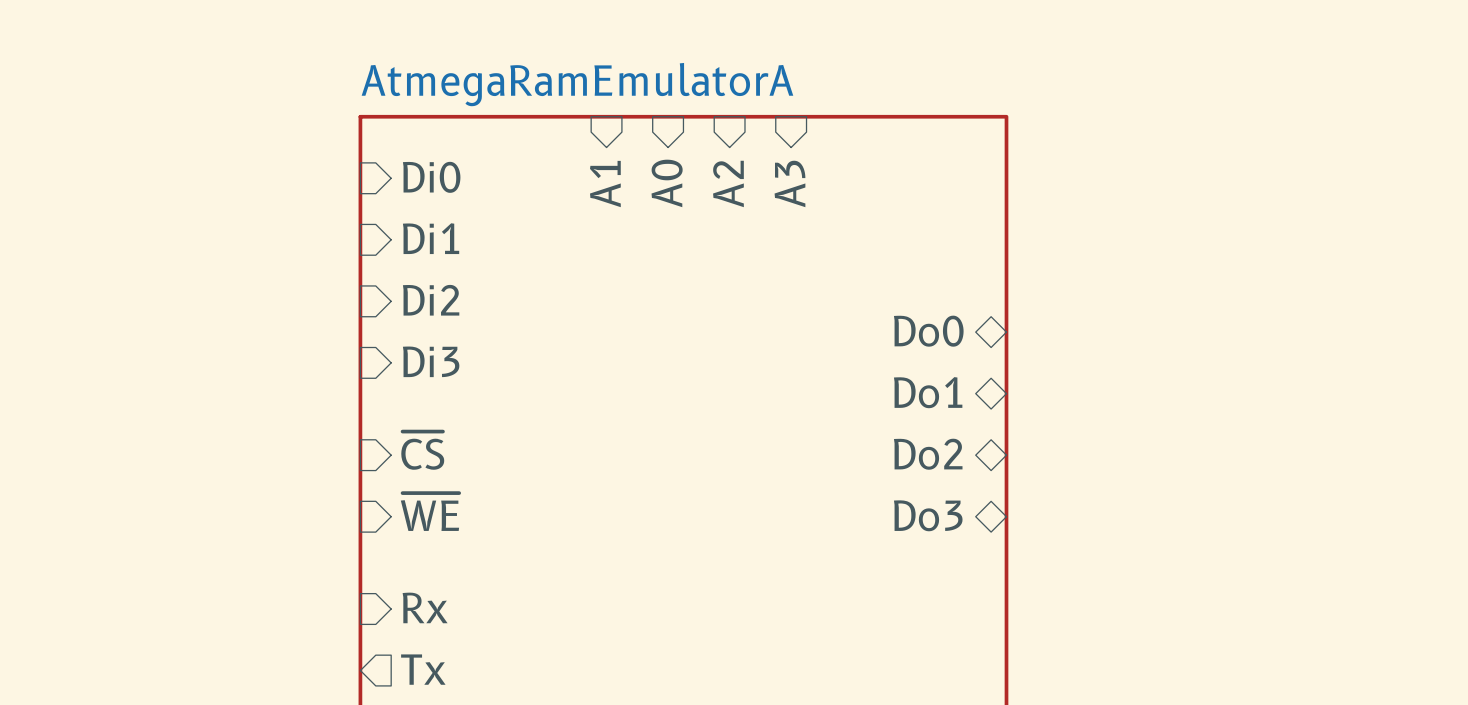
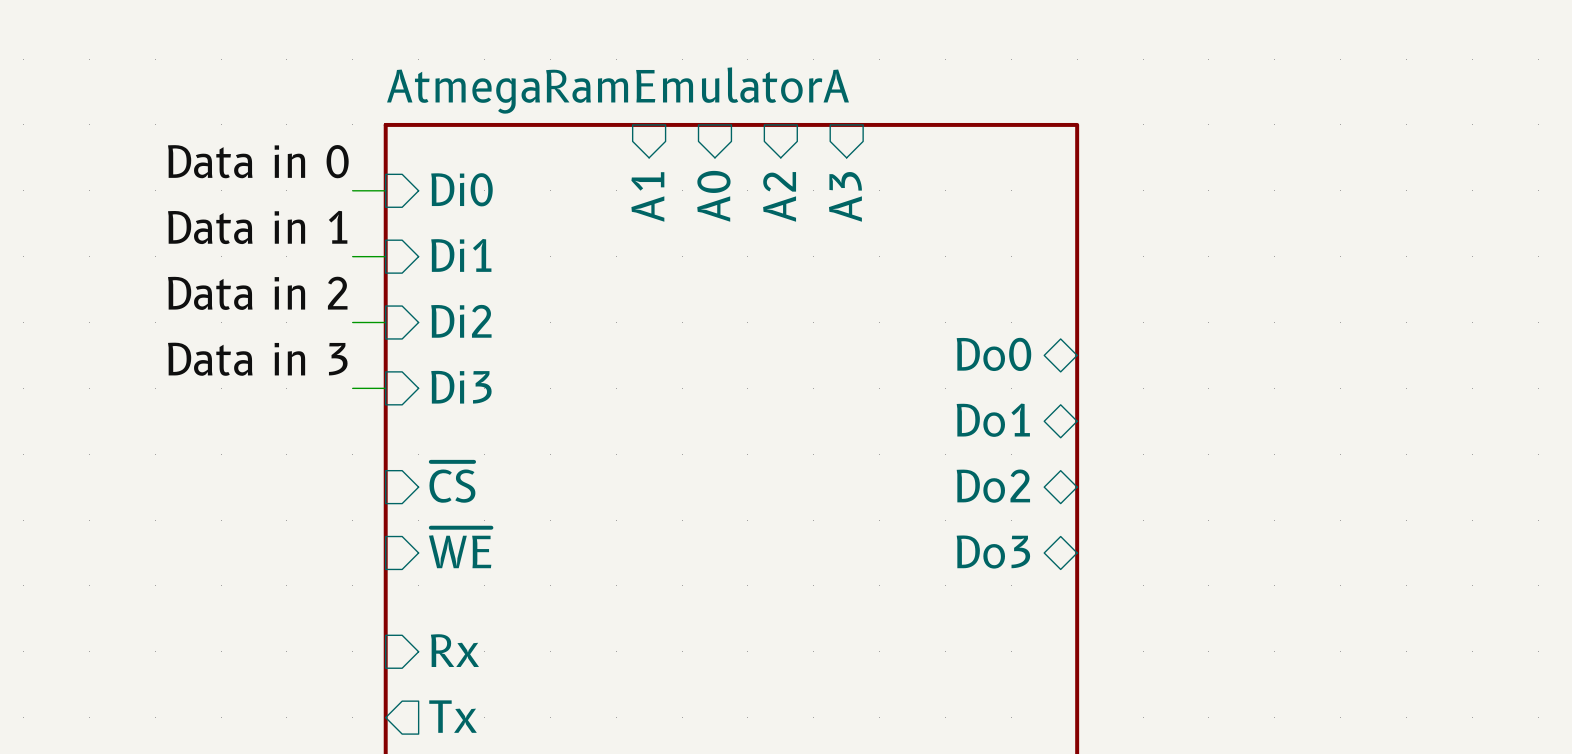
label: none -> Data in 0 (258, 161)
wire: none -> (352, 190) (385, 190)
label: none -> Data in 1 (257, 227)
wire: none -> (352, 256) (385, 256)
label: none -> Data in 2 (257, 293)
wire: none -> (352, 322) (385, 322)
label: none -> Data in 3 (257, 359)
wire: none -> (352, 388) (385, 388)

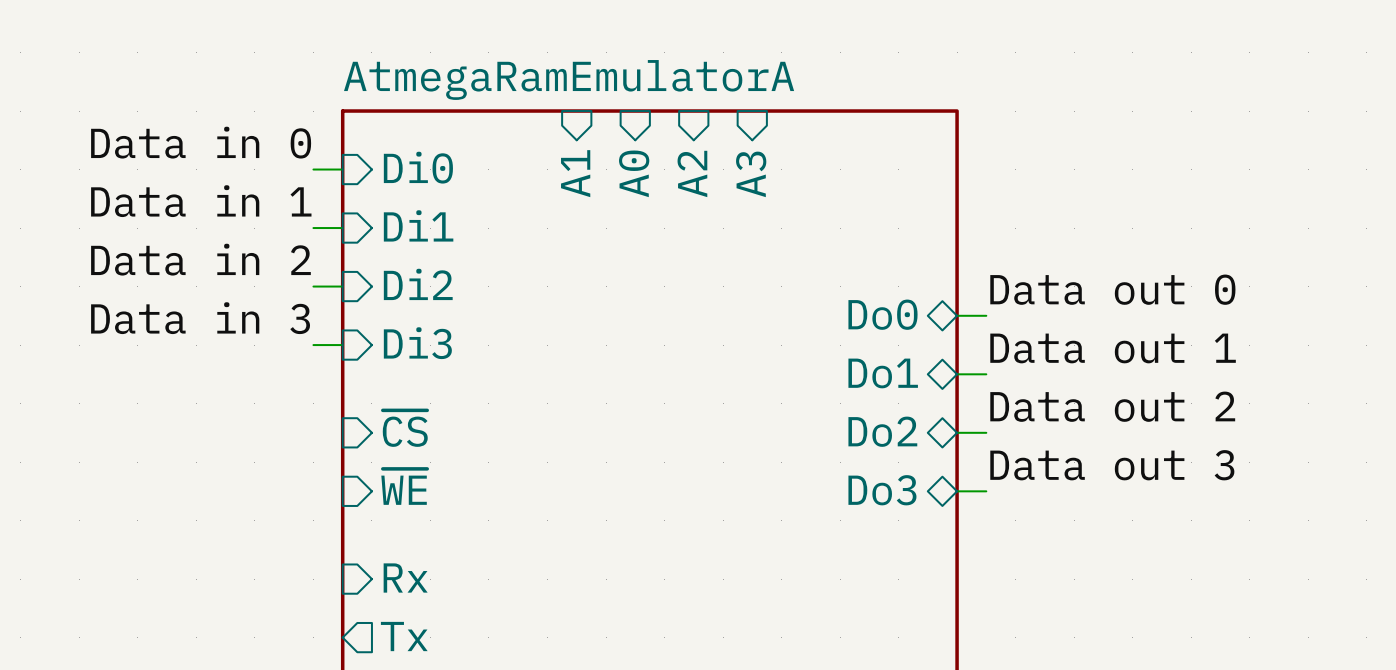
label: none -> Data out 0 (1112, 289)
wire: none -> (957, 315) (986, 315)
label: none -> Data out 1 (1113, 348)
wire: none -> (957, 374) (986, 374)
label: none -> Data out 2 (1112, 406)
wire: none -> (957, 432) (986, 432)
label: none -> Data out 3 (1112, 465)
wire: none -> (957, 491) (986, 491)

